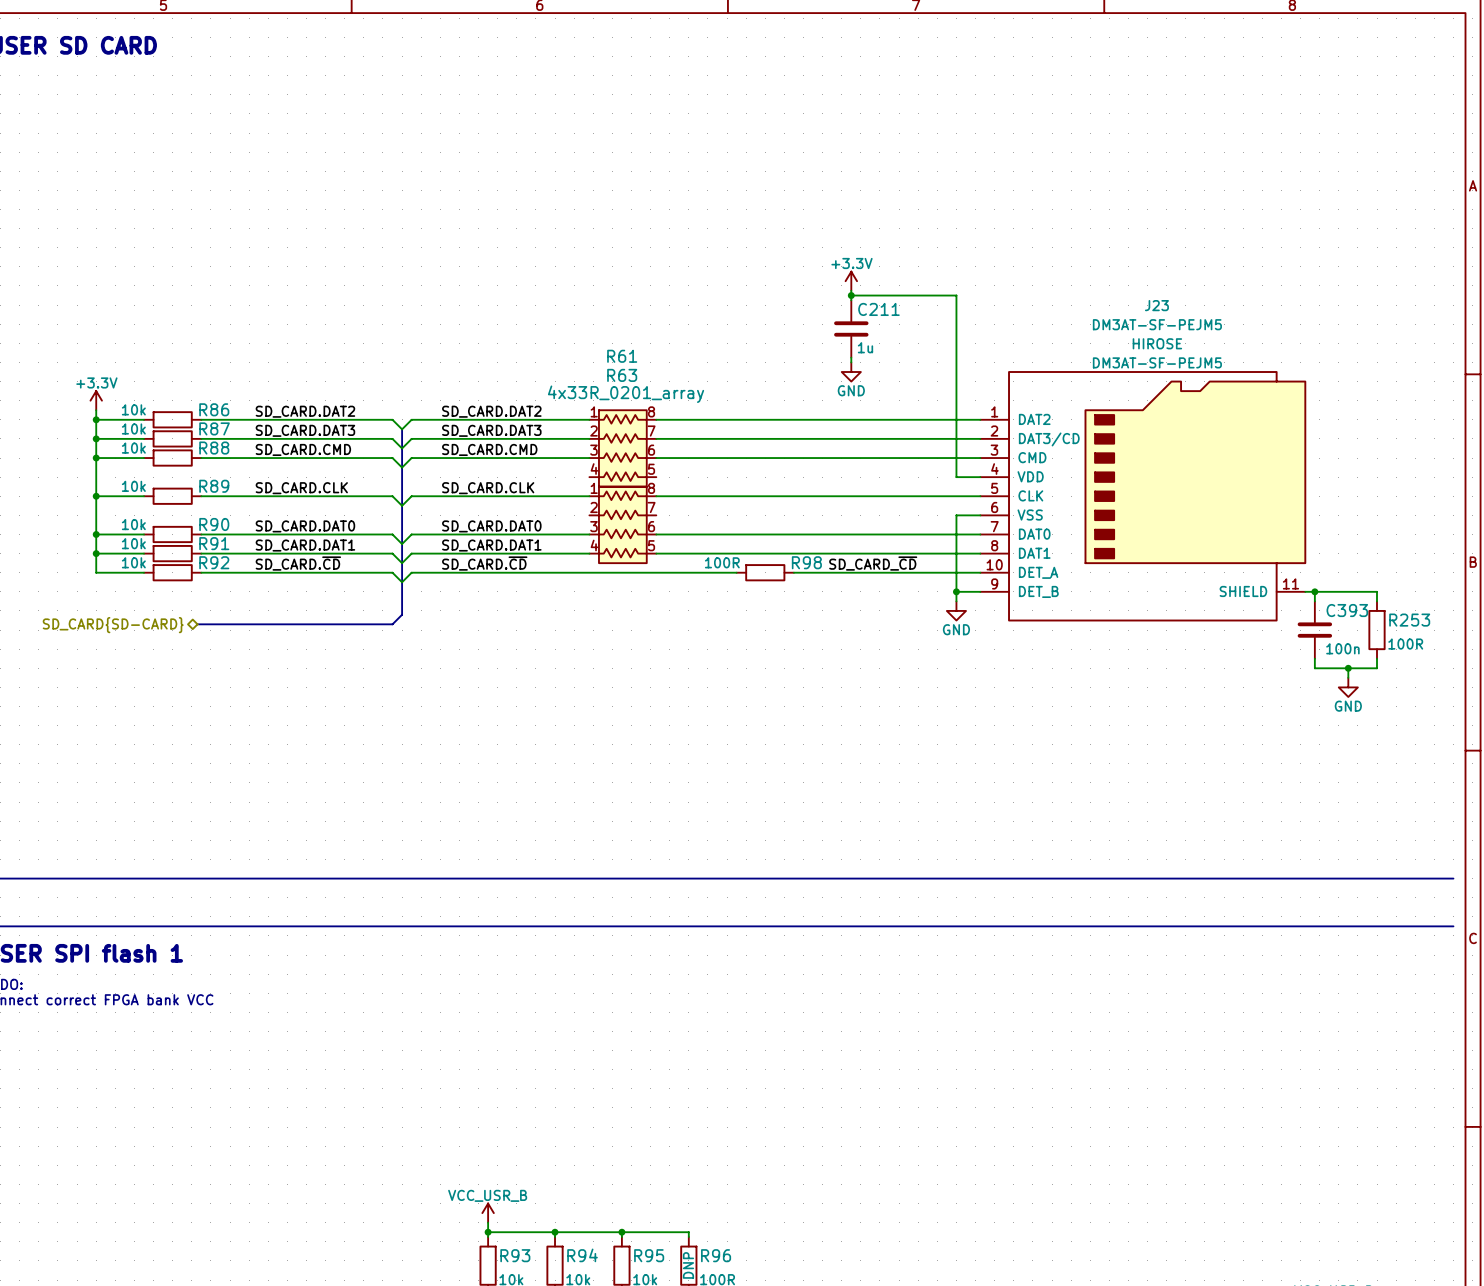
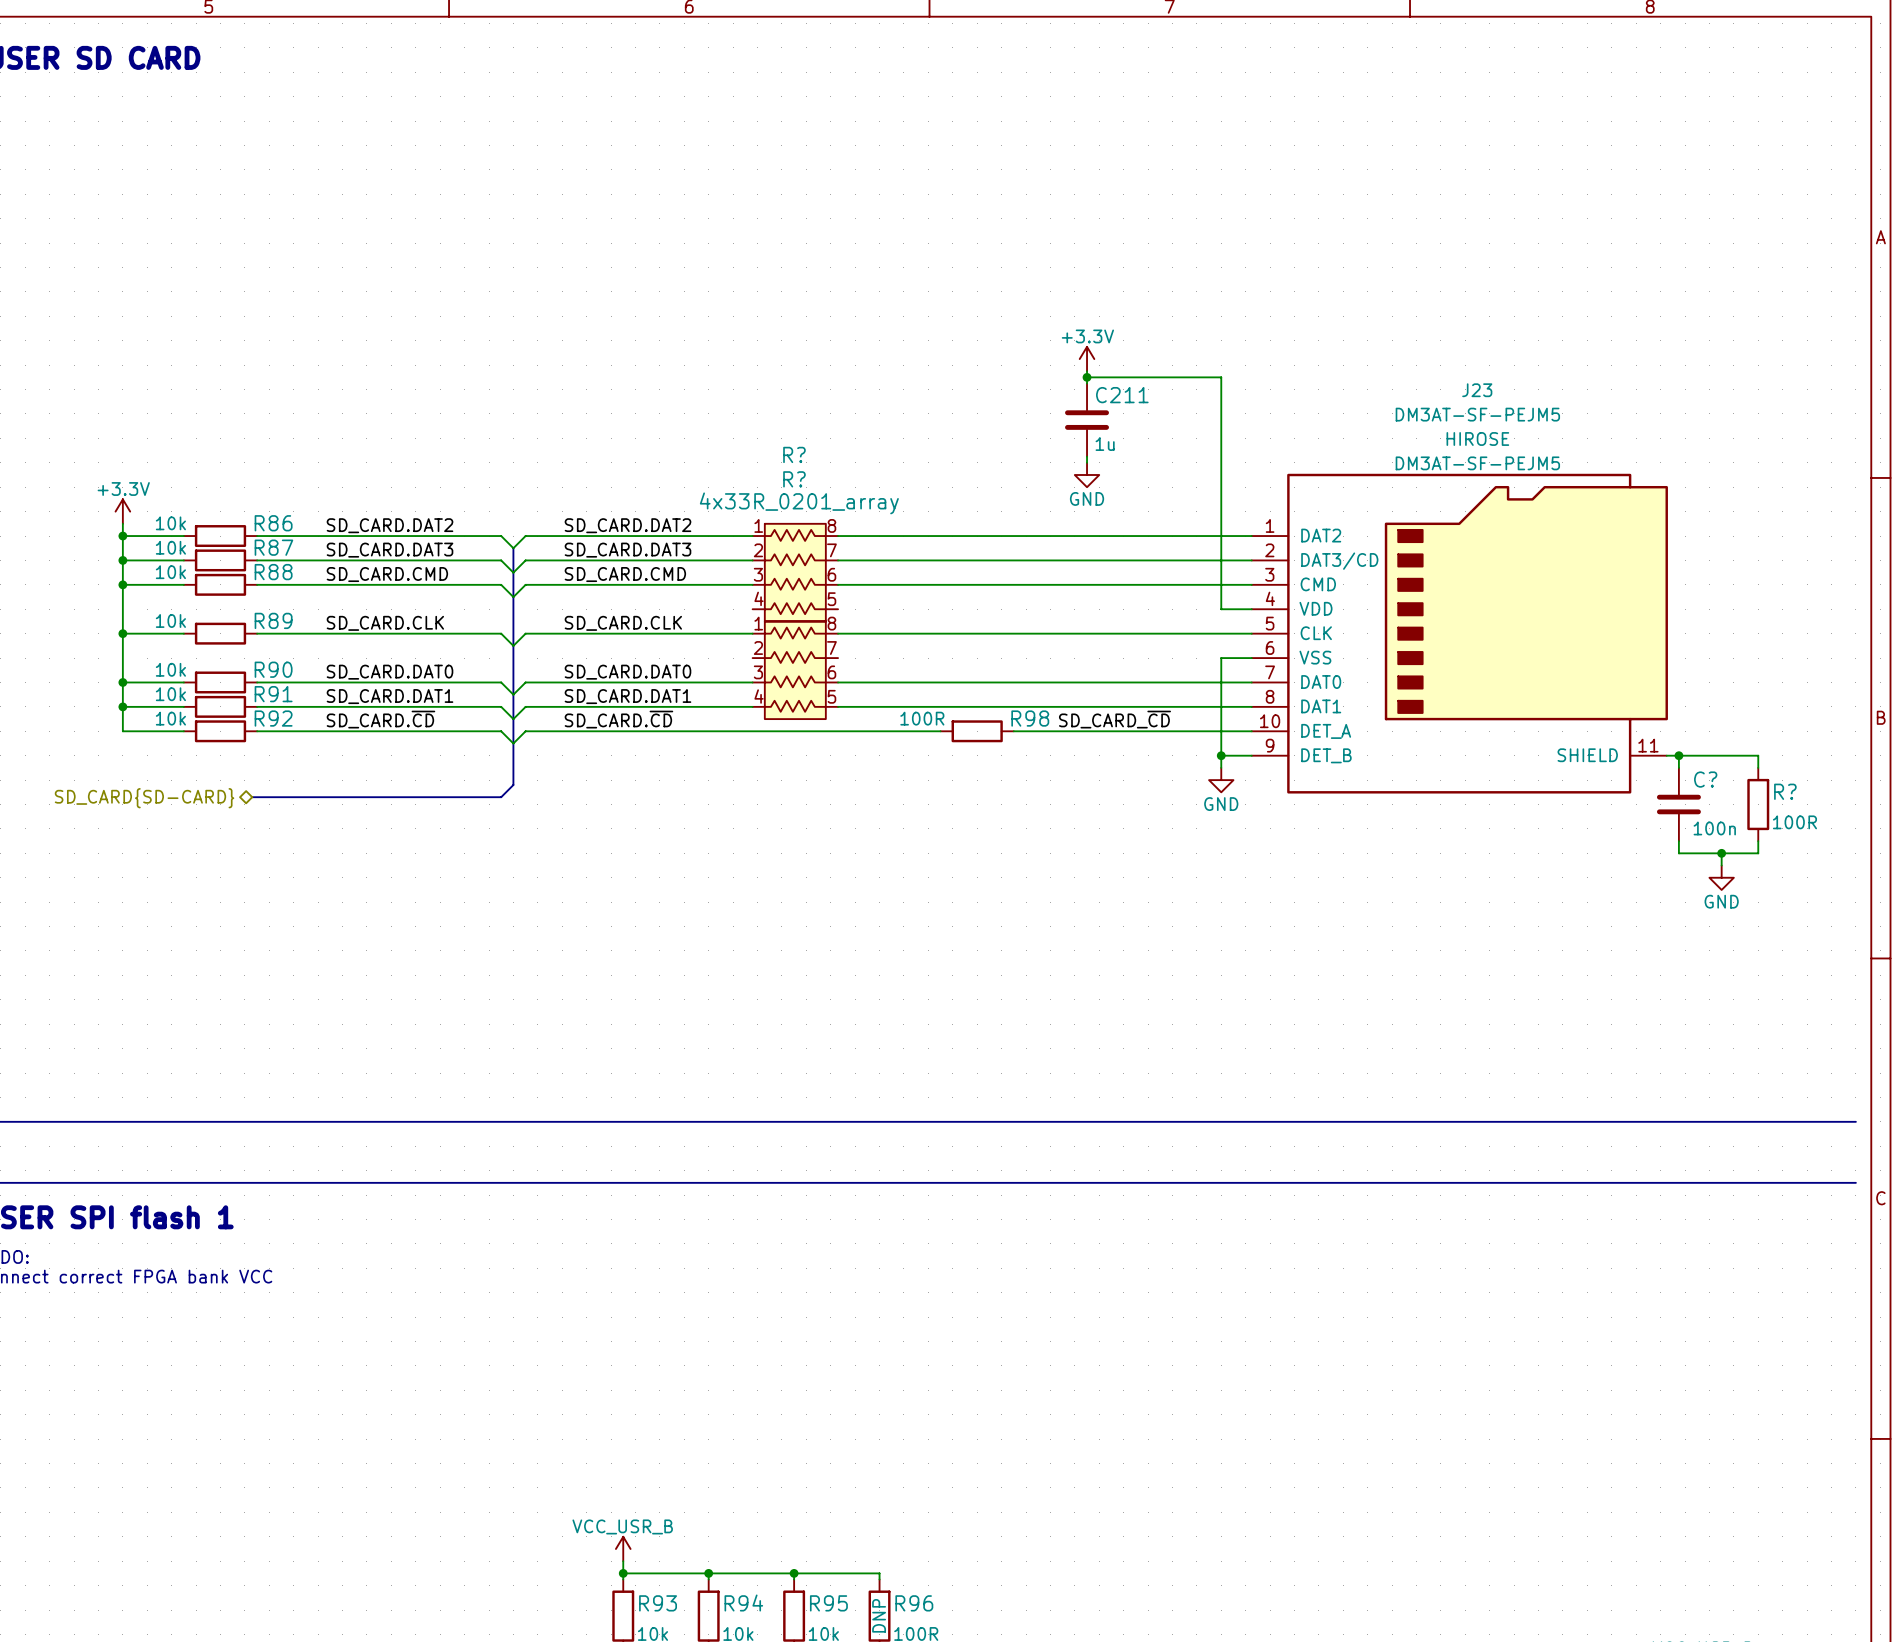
R61 name: R61 (622, 356) -> R? (794, 454)
R63 name: R63 (622, 375) -> R? (794, 479)
C393 name: C393 (1347, 610) -> C? (1705, 779)
R253 name: R253 (1409, 620) -> R? (1785, 791)

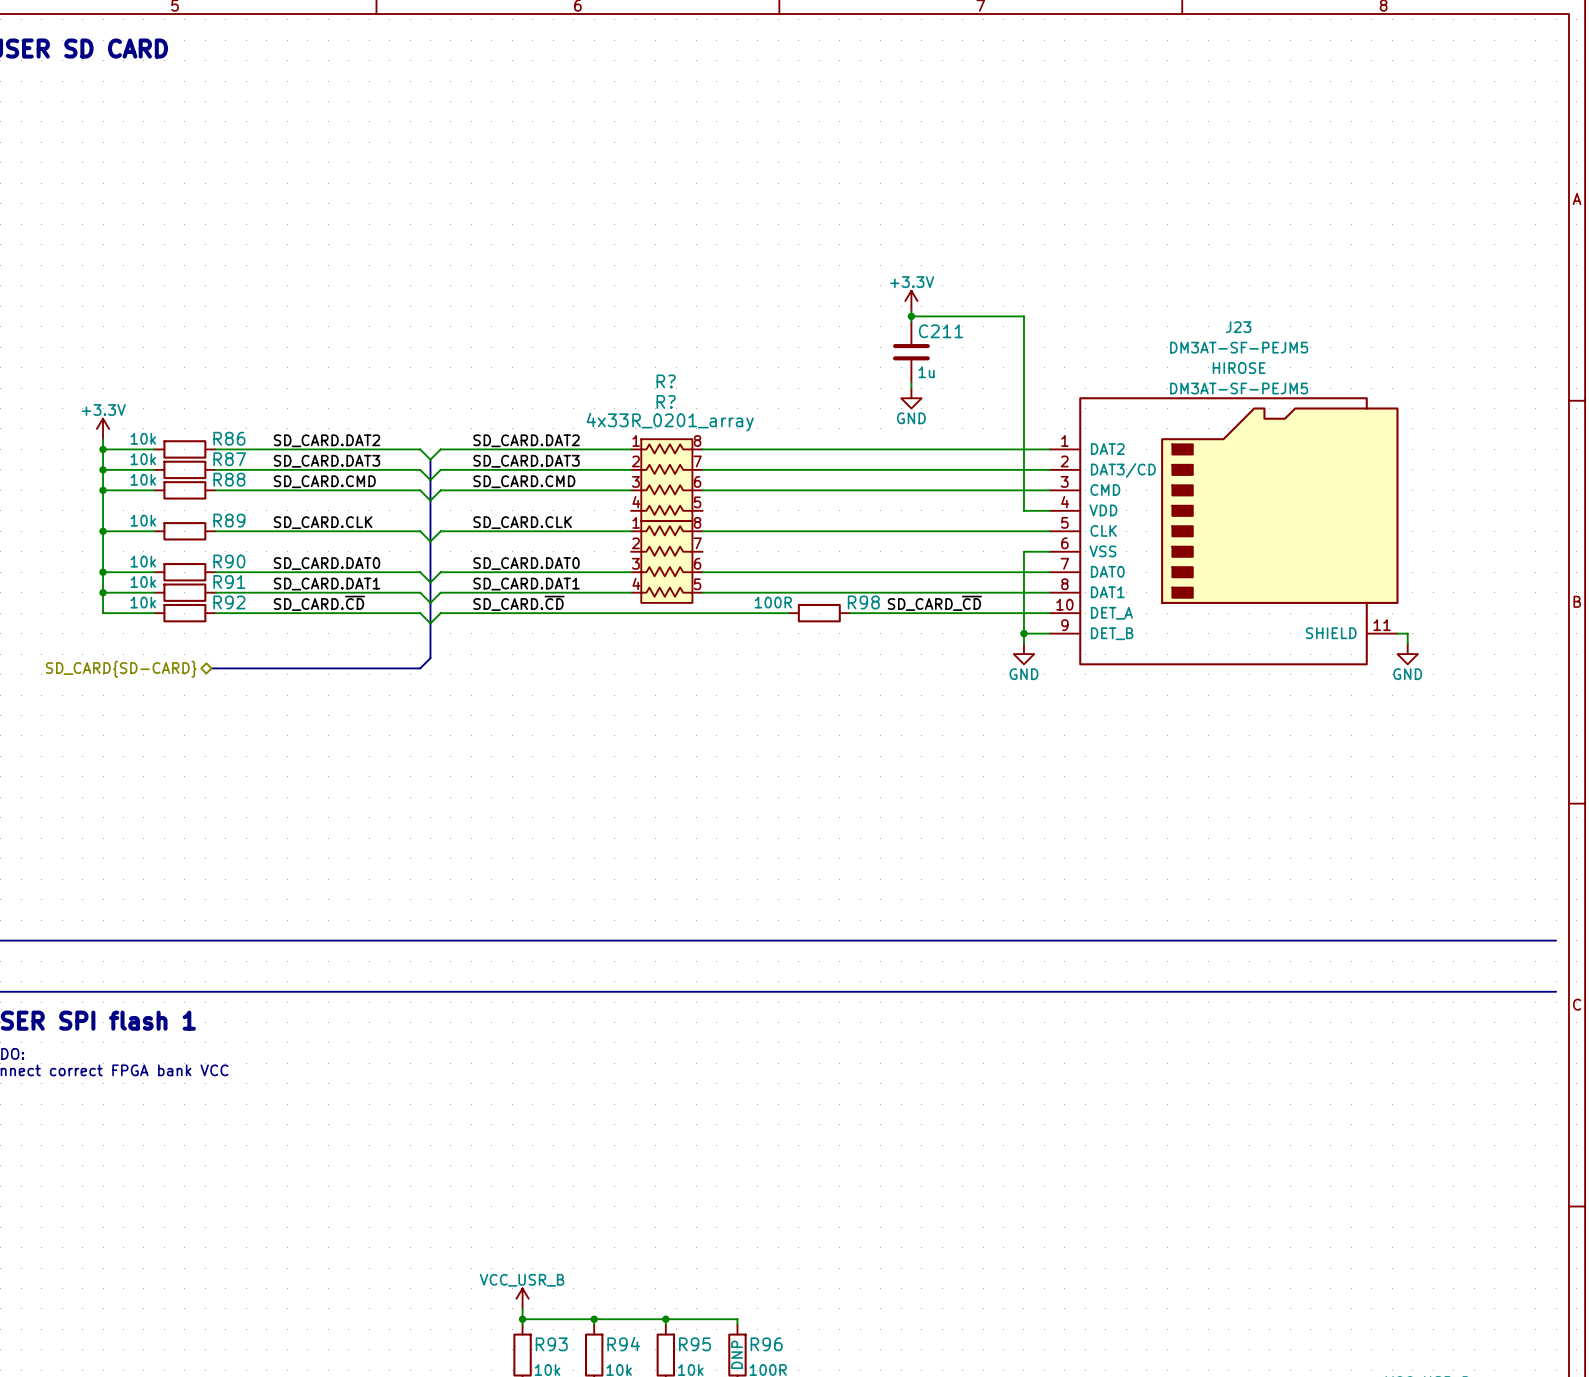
wire: (1678, 755) (1758, 755) (1758, 767) -> none
junction: (1678, 755) -> none
C?: (1678, 804) -> none
R?: (1758, 804) -> none
wire: (1678, 841) (1678, 853) (1758, 853) (1758, 841) -> none
wire: (1721, 853) (1721, 865) -> none
junction: (1721, 853) -> none
power symbol position: GND (1721, 877) -> GND (1407, 654)

